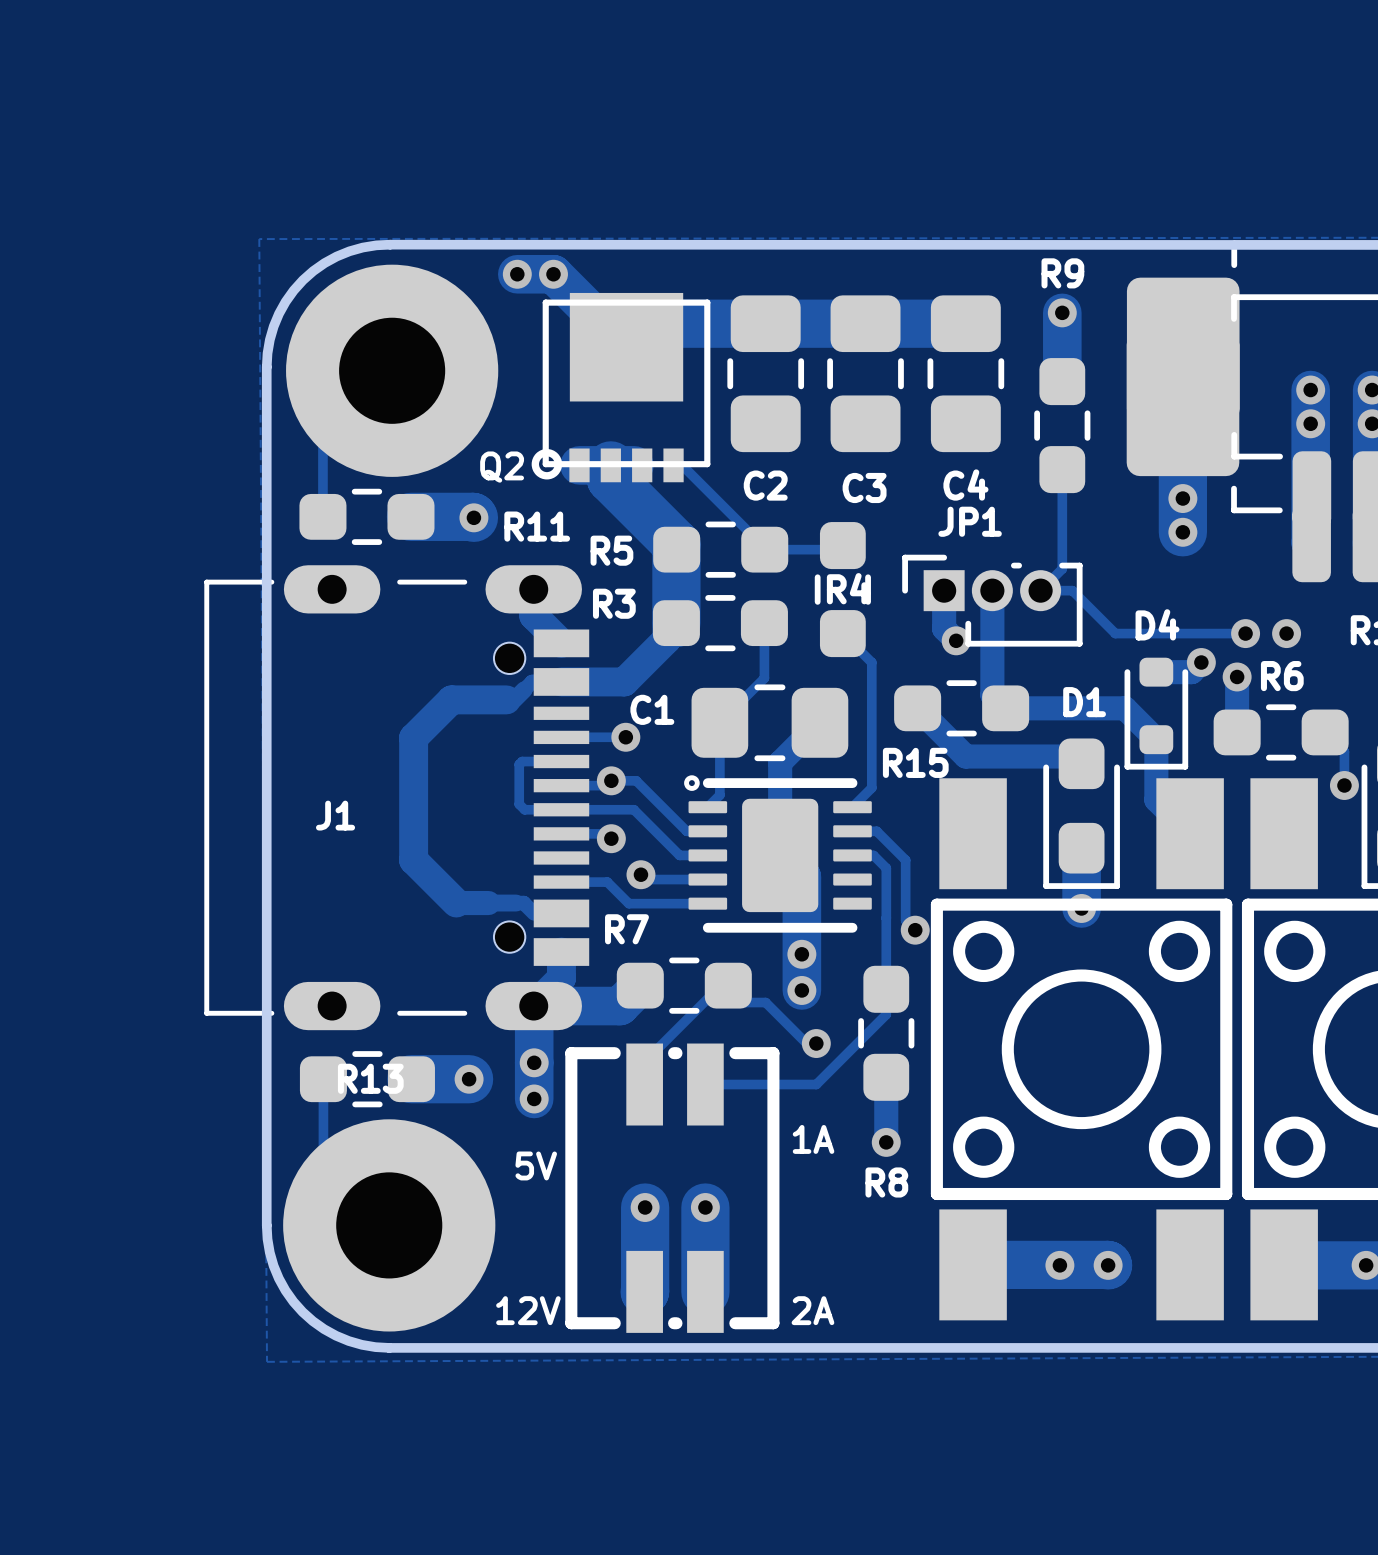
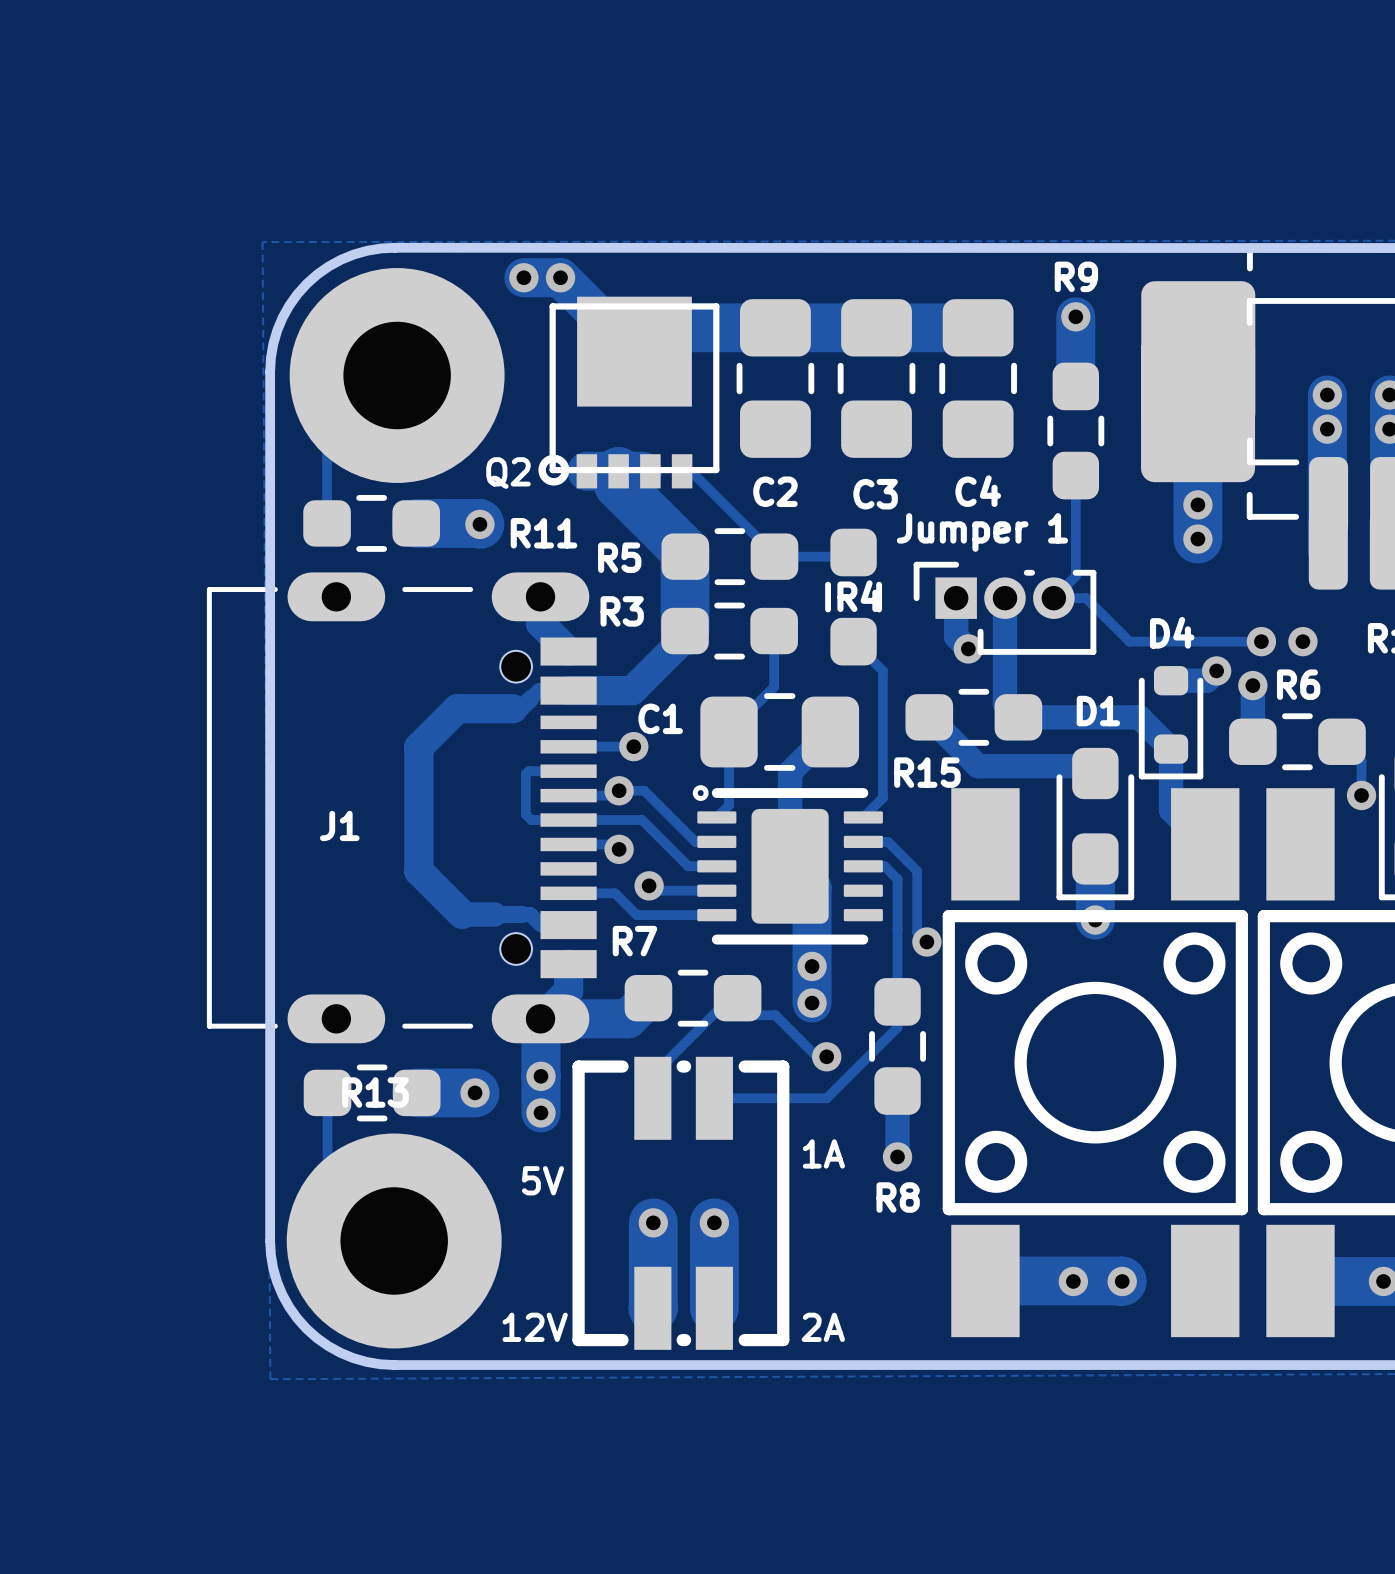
JP1 name: JP1 (970, 521) -> Jumper 1 (982, 532)

